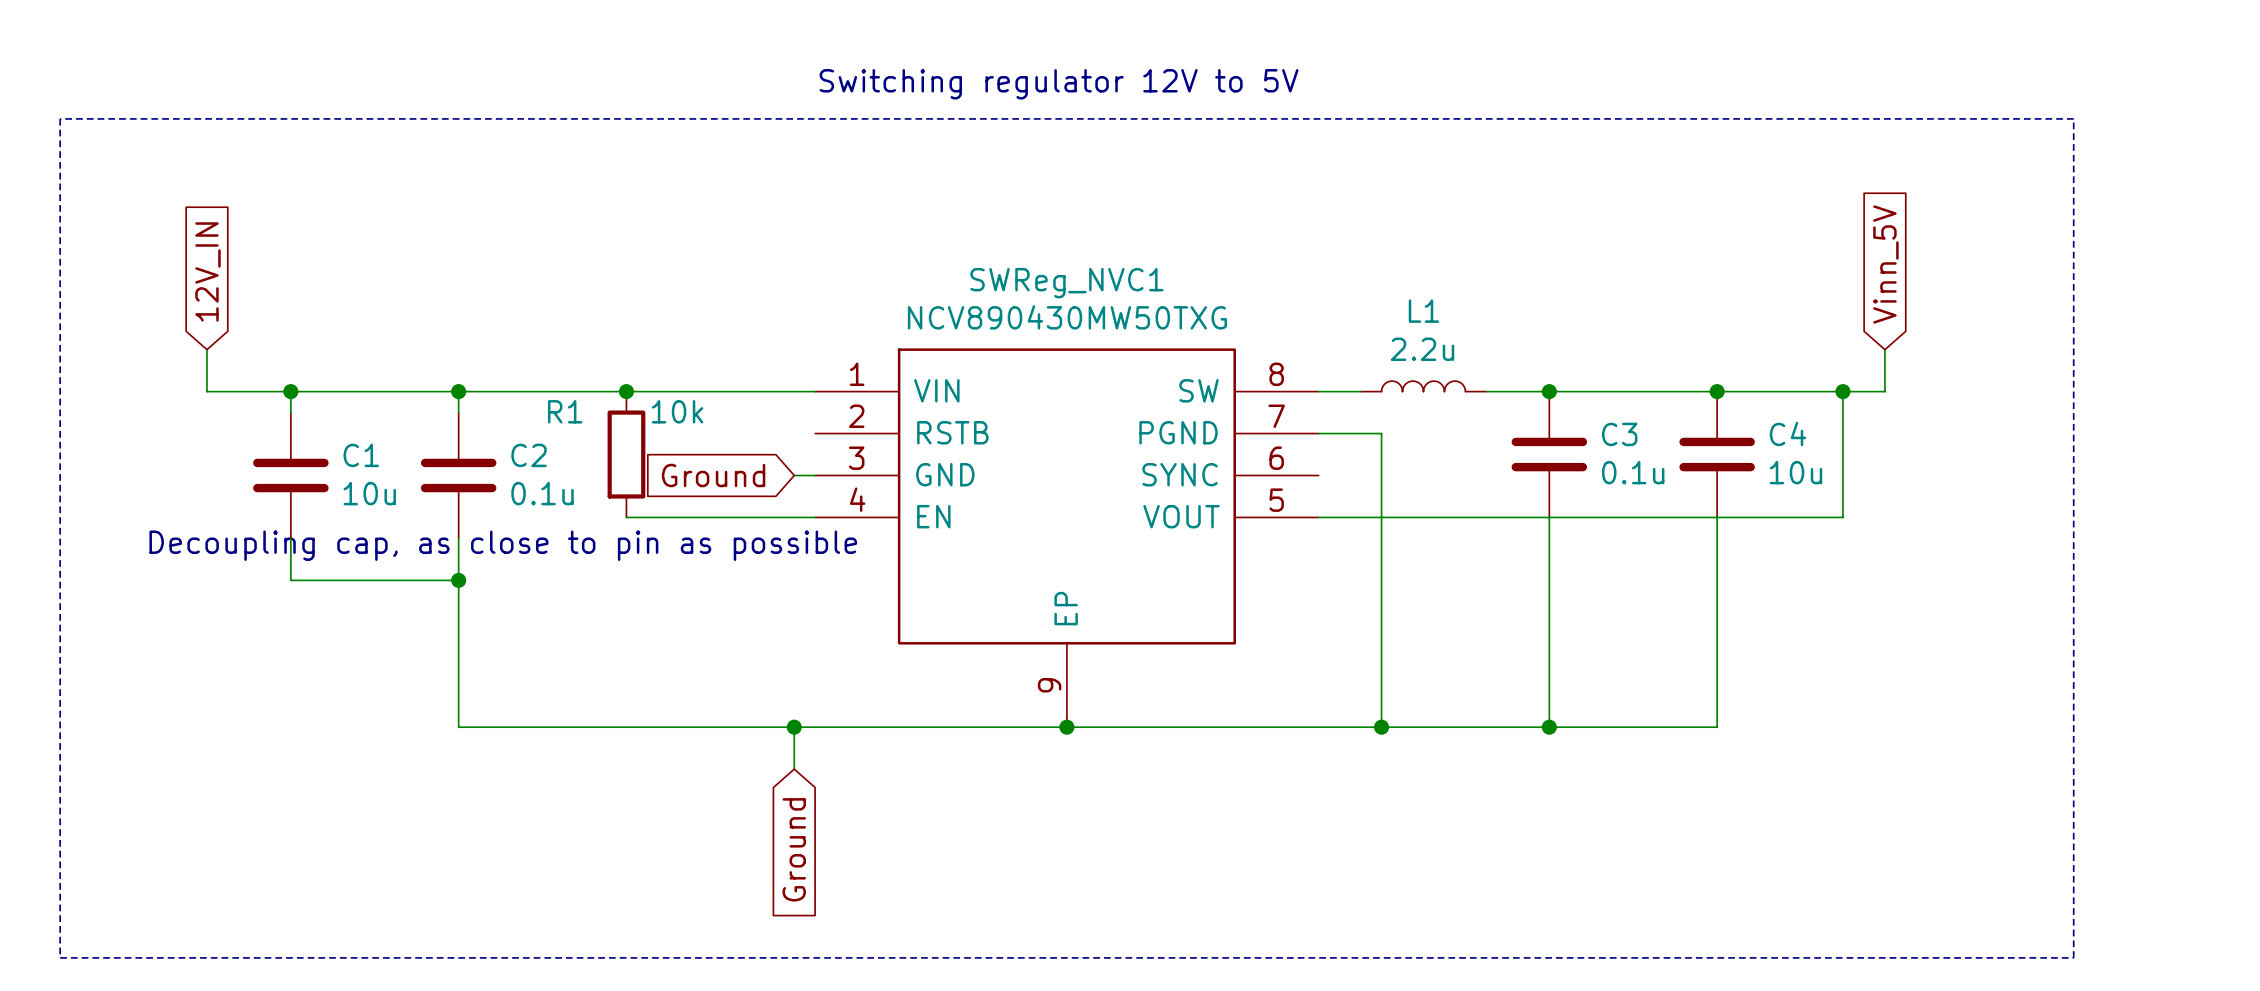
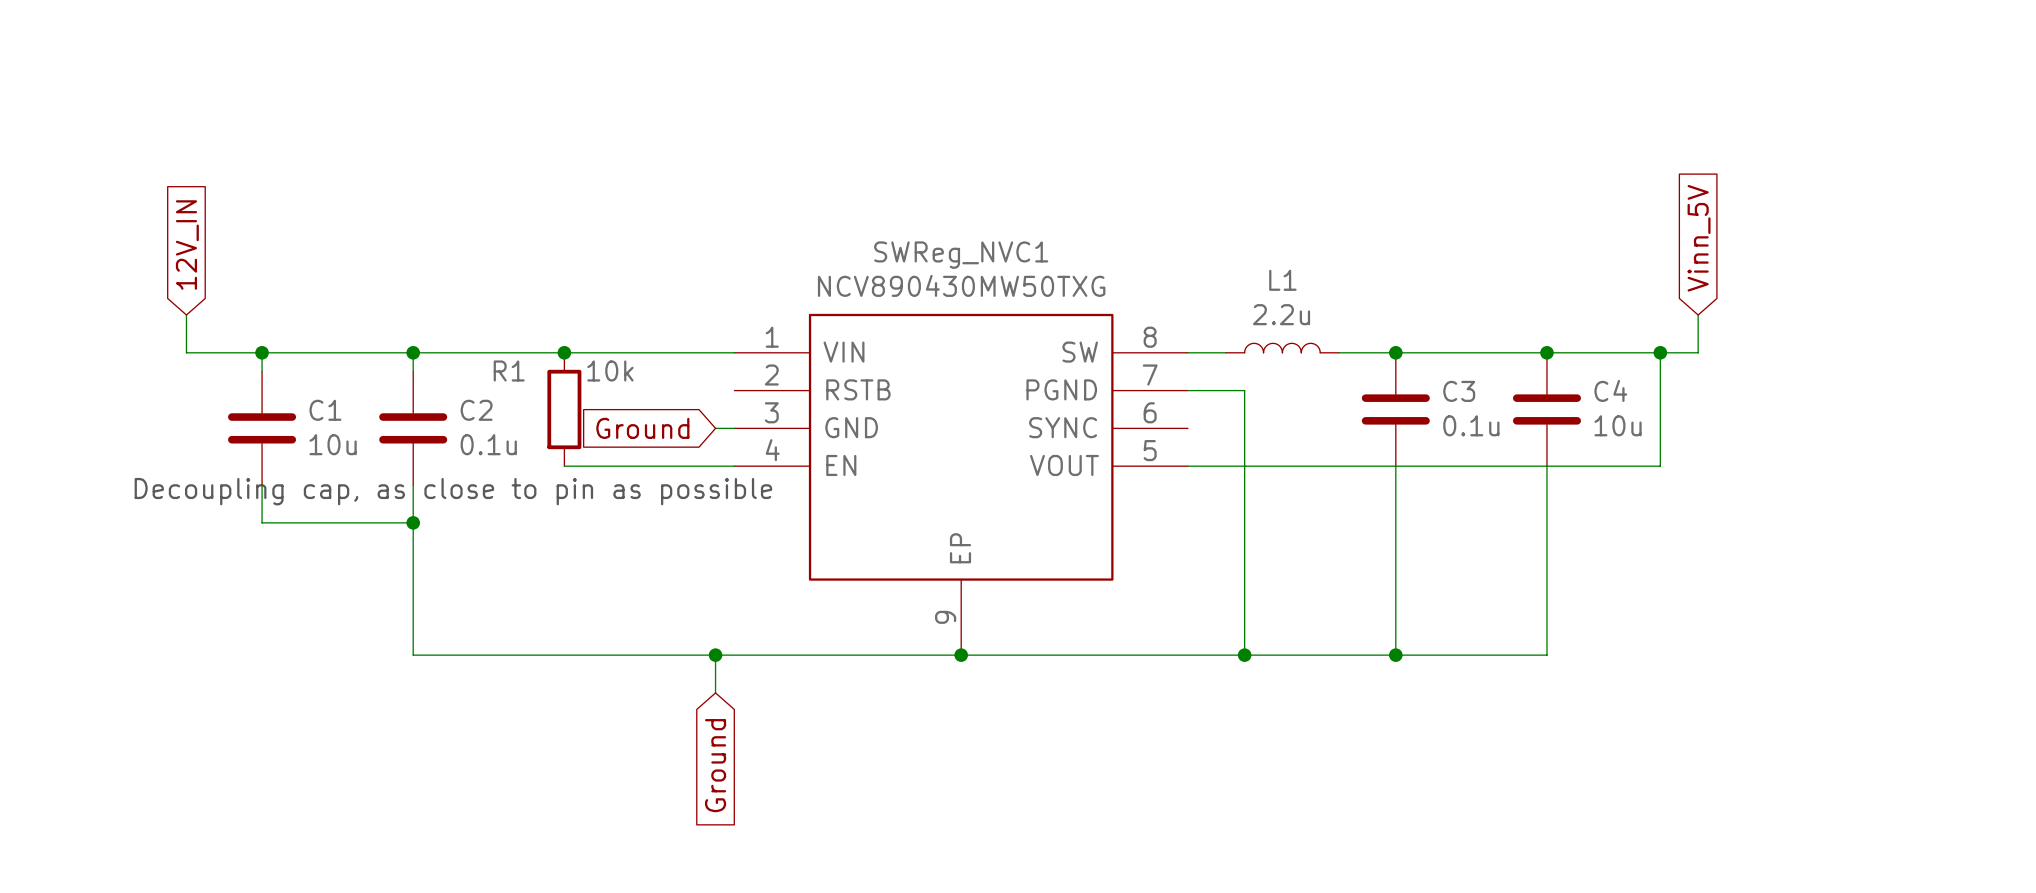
text: Switching regulator 12V to 5V (1059, 84) -> none
line: (60, 118) (60, 957) (2073, 957) (2073, 118) (60, 118) -> none

